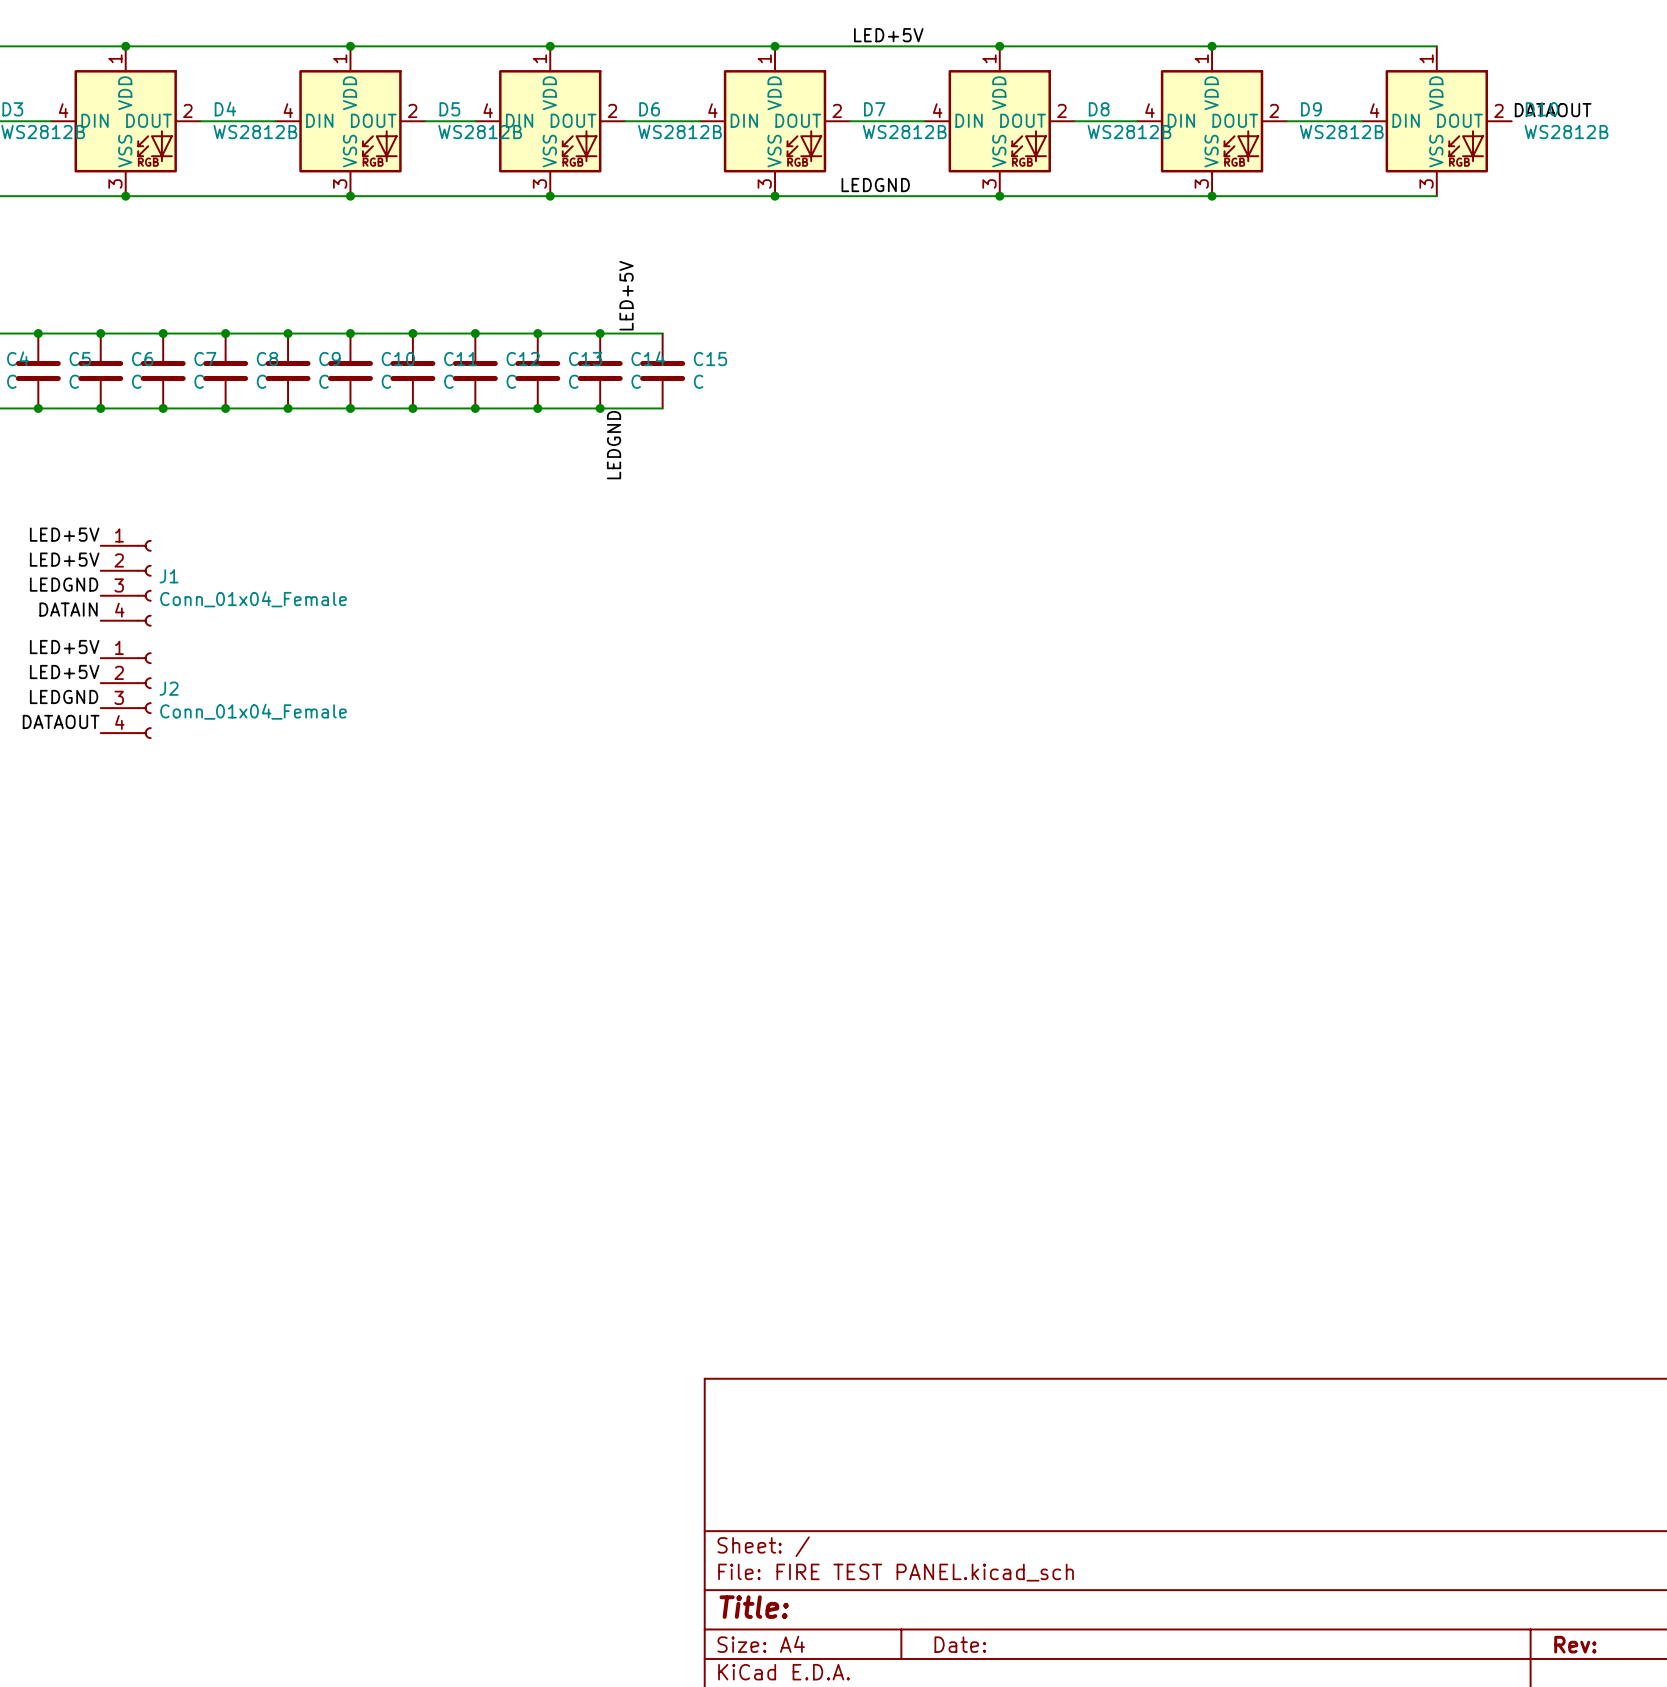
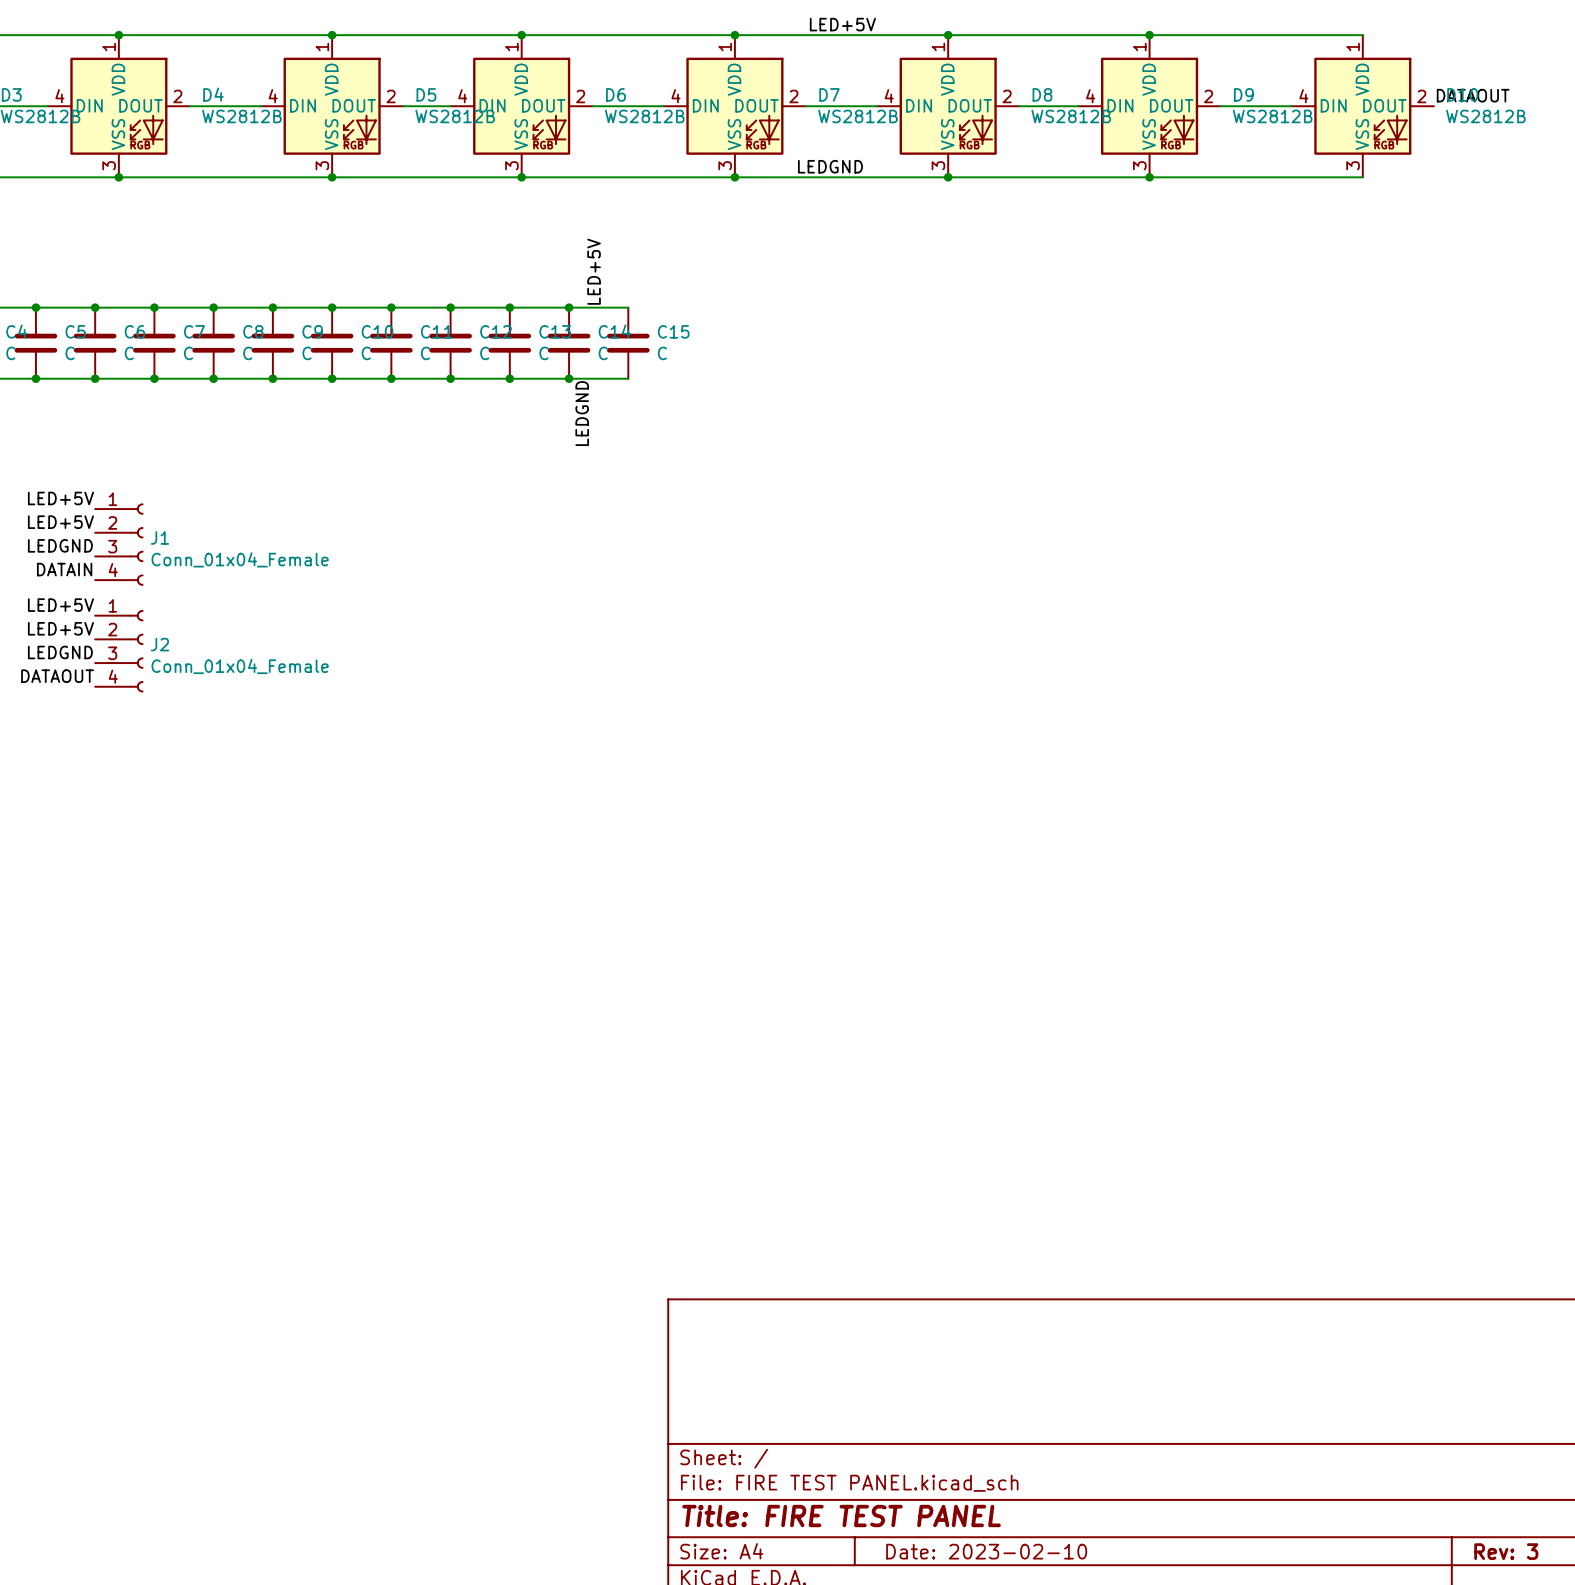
title block: Title: (754, 1607) -> Title: FIRE TEST PANEL (841, 1516)
title block: Date: (960, 1644) -> Date: 2023-02-10 (986, 1551)
title block: Rev: (1575, 1644) -> Rev: 3 (1506, 1551)

